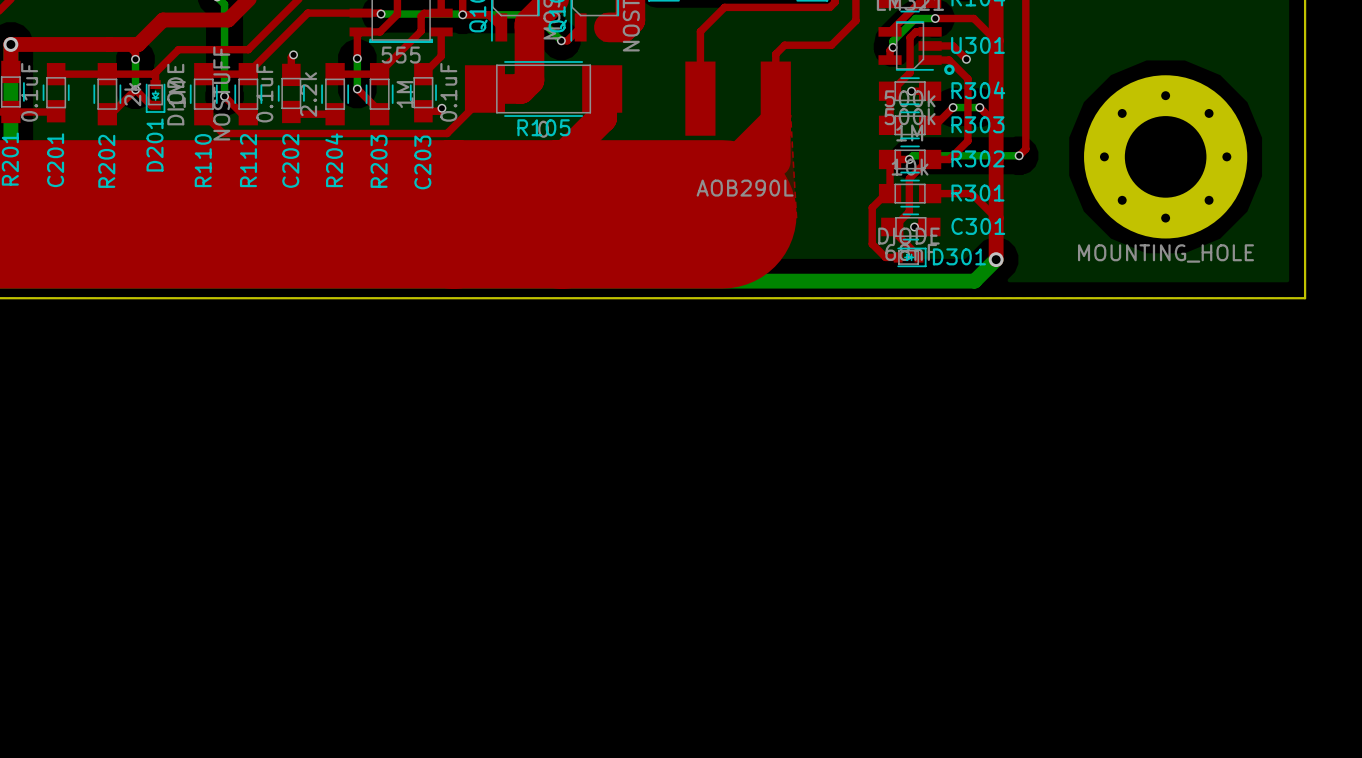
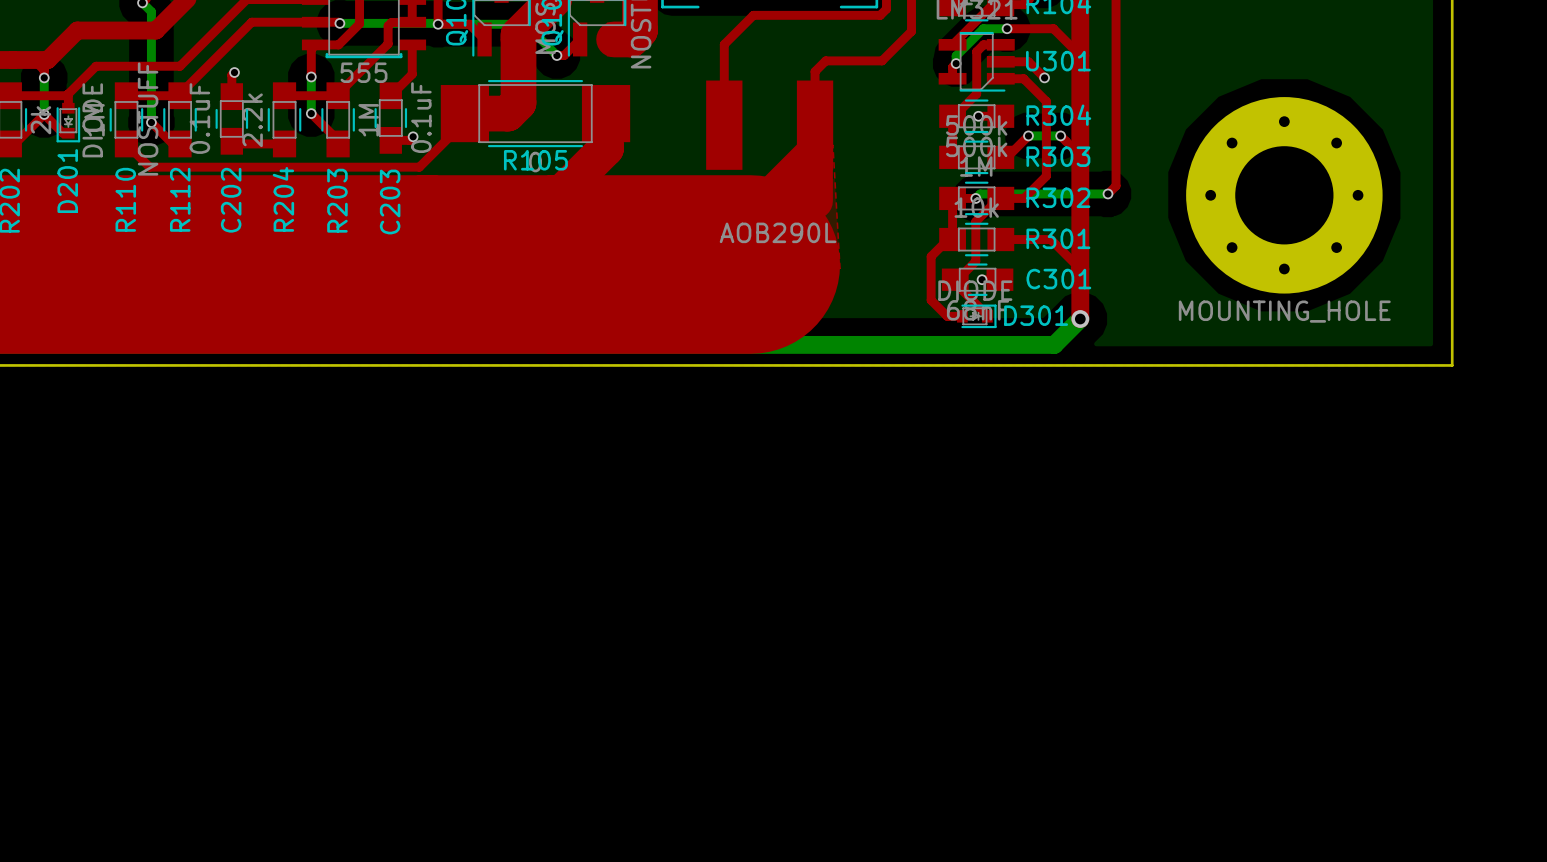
drawing: [944, 64, 955, 75] -> none
D201 footprint: [145, 80, 166, 113] -> [56, 102, 81, 143]
D301 footprint: [893, 247, 927, 268] -> [957, 304, 997, 329]

